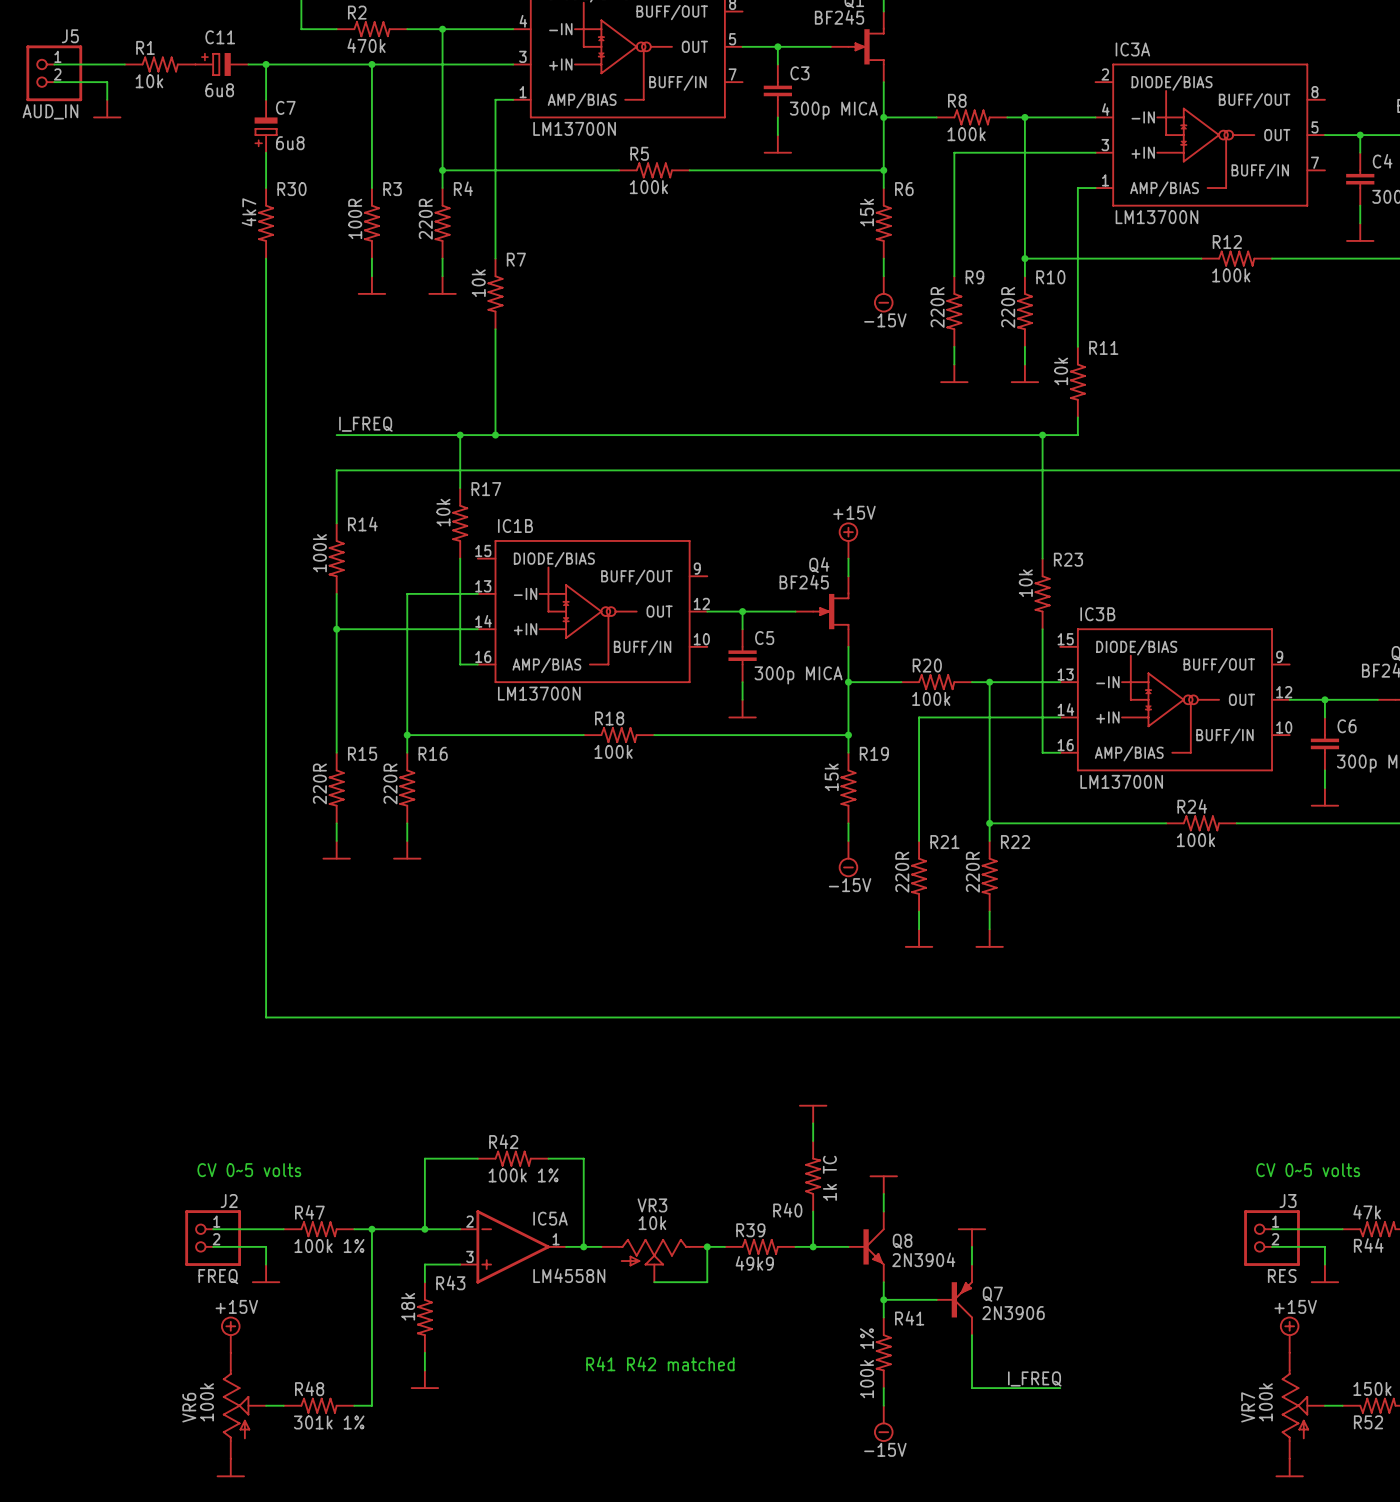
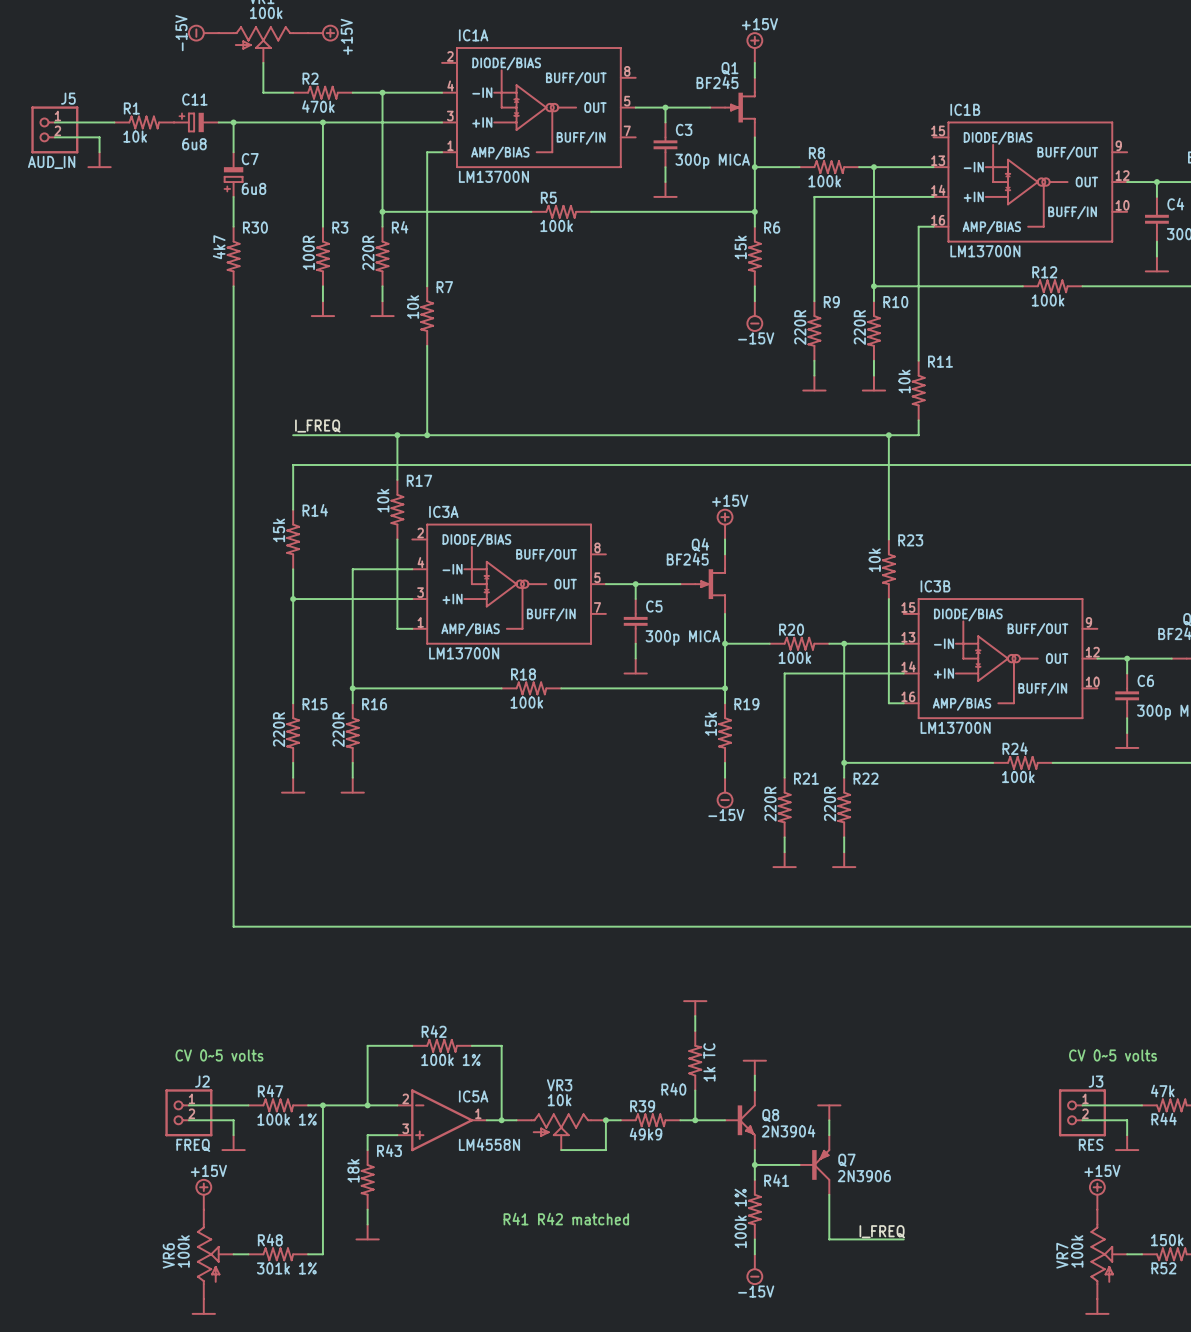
IC3A position: (1210, 135) -> (509, 584)
R14 value: 100k (319, 553) -> 15k (279, 530)
IC1B position: (592, 611) -> (1030, 182)

